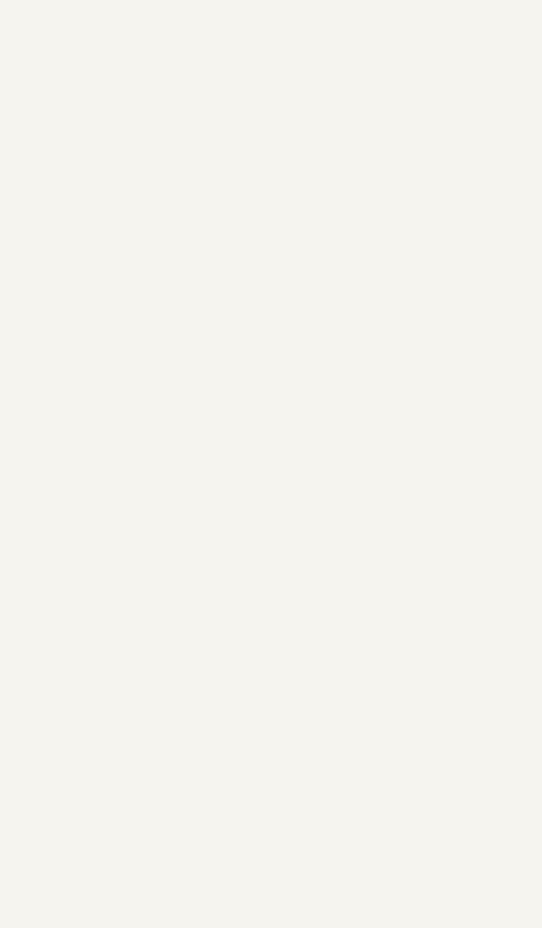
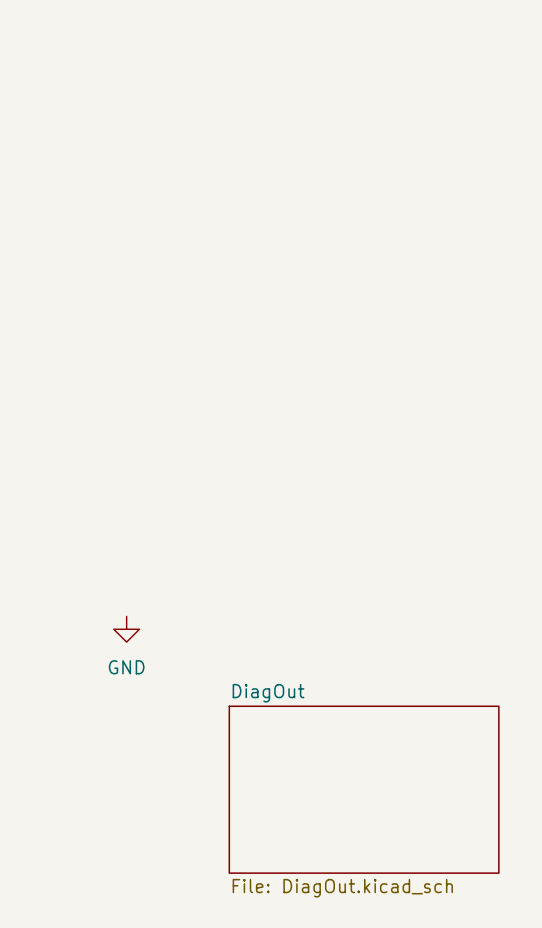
power symbol: none -> GND (126, 629)
sheet DiagOut: none -> File: DiagOut.kicad_sch (364, 789)

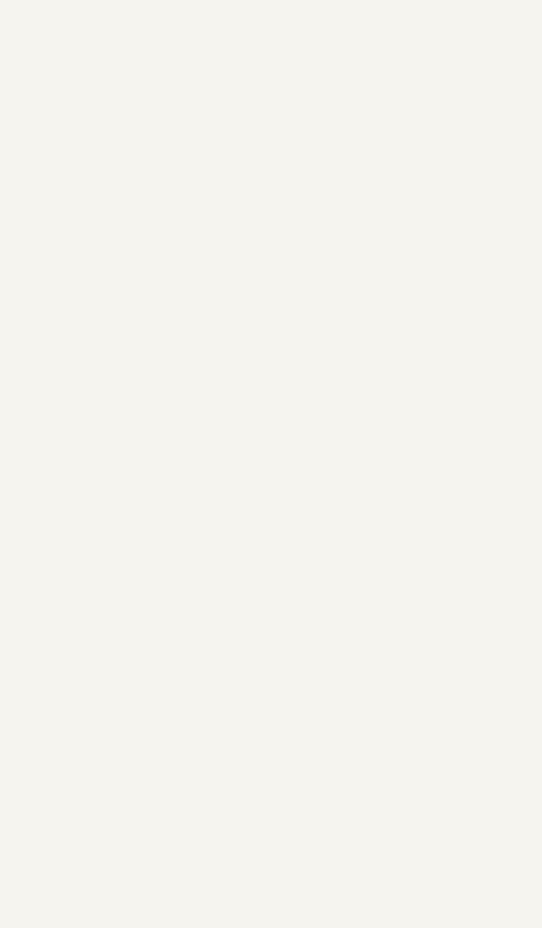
power symbol: GND (126, 629) -> none
sheet DiagOut: File: DiagOut.kicad_sch (364, 789) -> none

